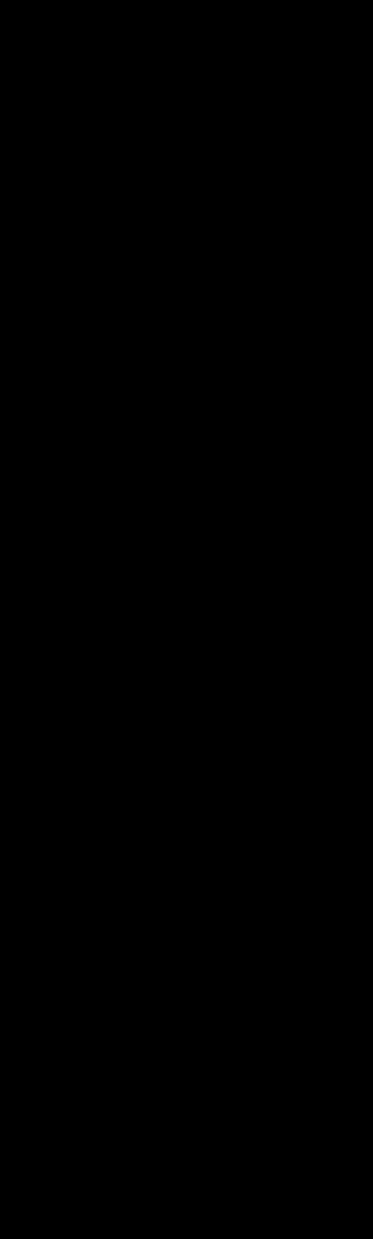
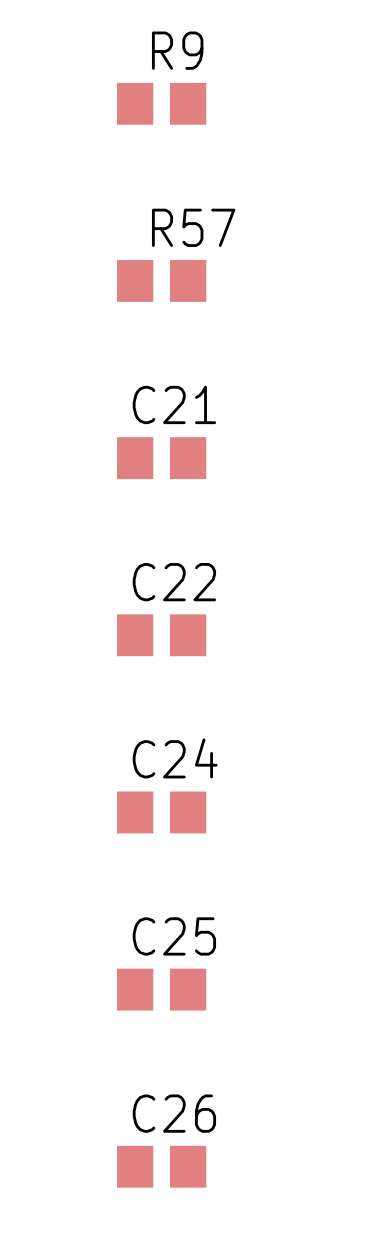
R9: none -> (161, 103)
R57: none -> (161, 280)
C21: none -> (161, 458)
C22: none -> (161, 635)
C24: none -> (161, 812)
C25: none -> (161, 989)
C26: none -> (161, 1166)

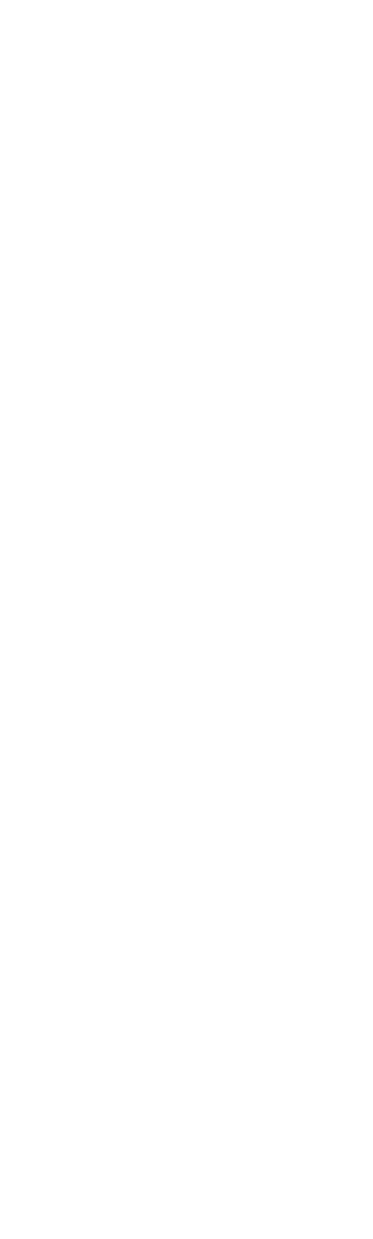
R9: (161, 103) -> none
R57: (161, 280) -> none
C21: (161, 458) -> none
C22: (161, 635) -> none
C24: (161, 812) -> none
C25: (161, 989) -> none
C26: (161, 1166) -> none

